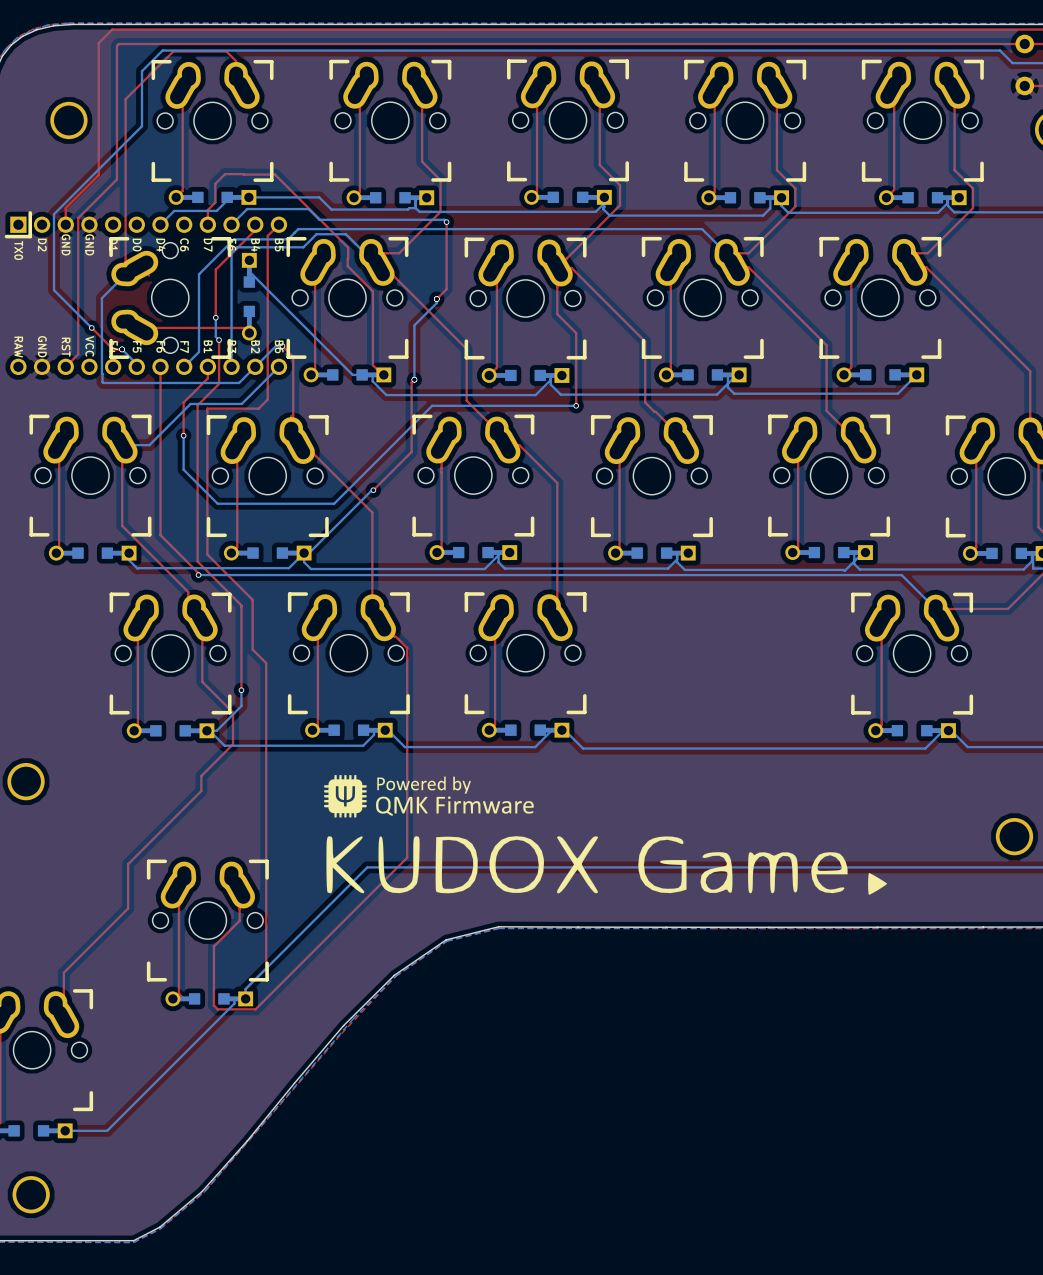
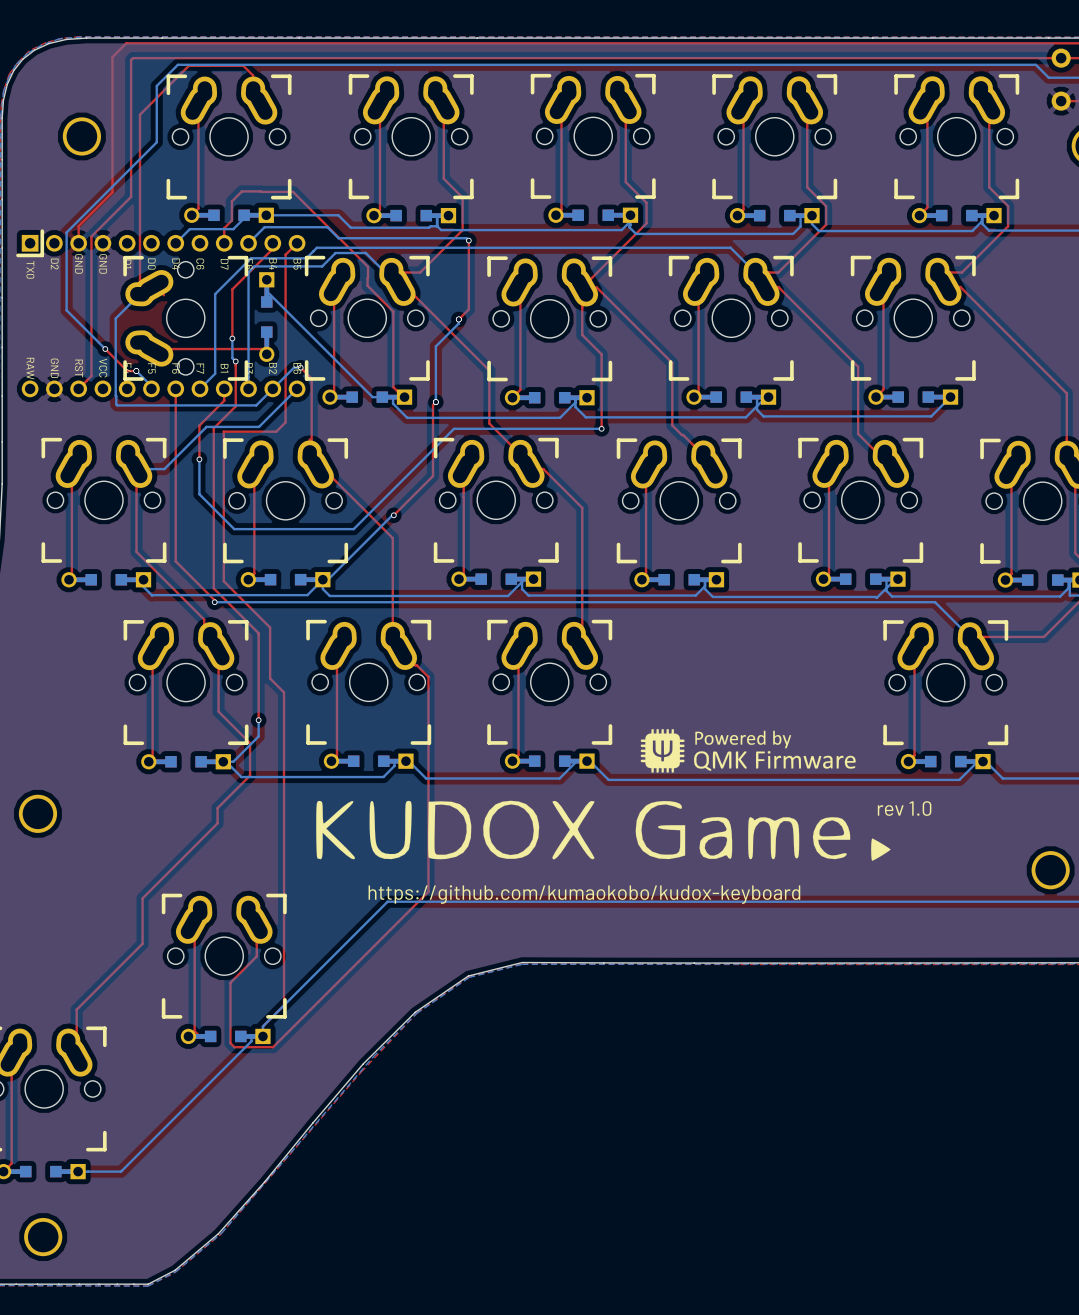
drawing: none -> [640, 729, 856, 773]
drawing: [324, 775, 534, 818] -> none
text: none -> rev 1.0 (904, 808)
text: none -> https://github.com/kumaokobo/kudox-keyboard (584, 894)
drawing position: (606, 865) -> (603, 830)

